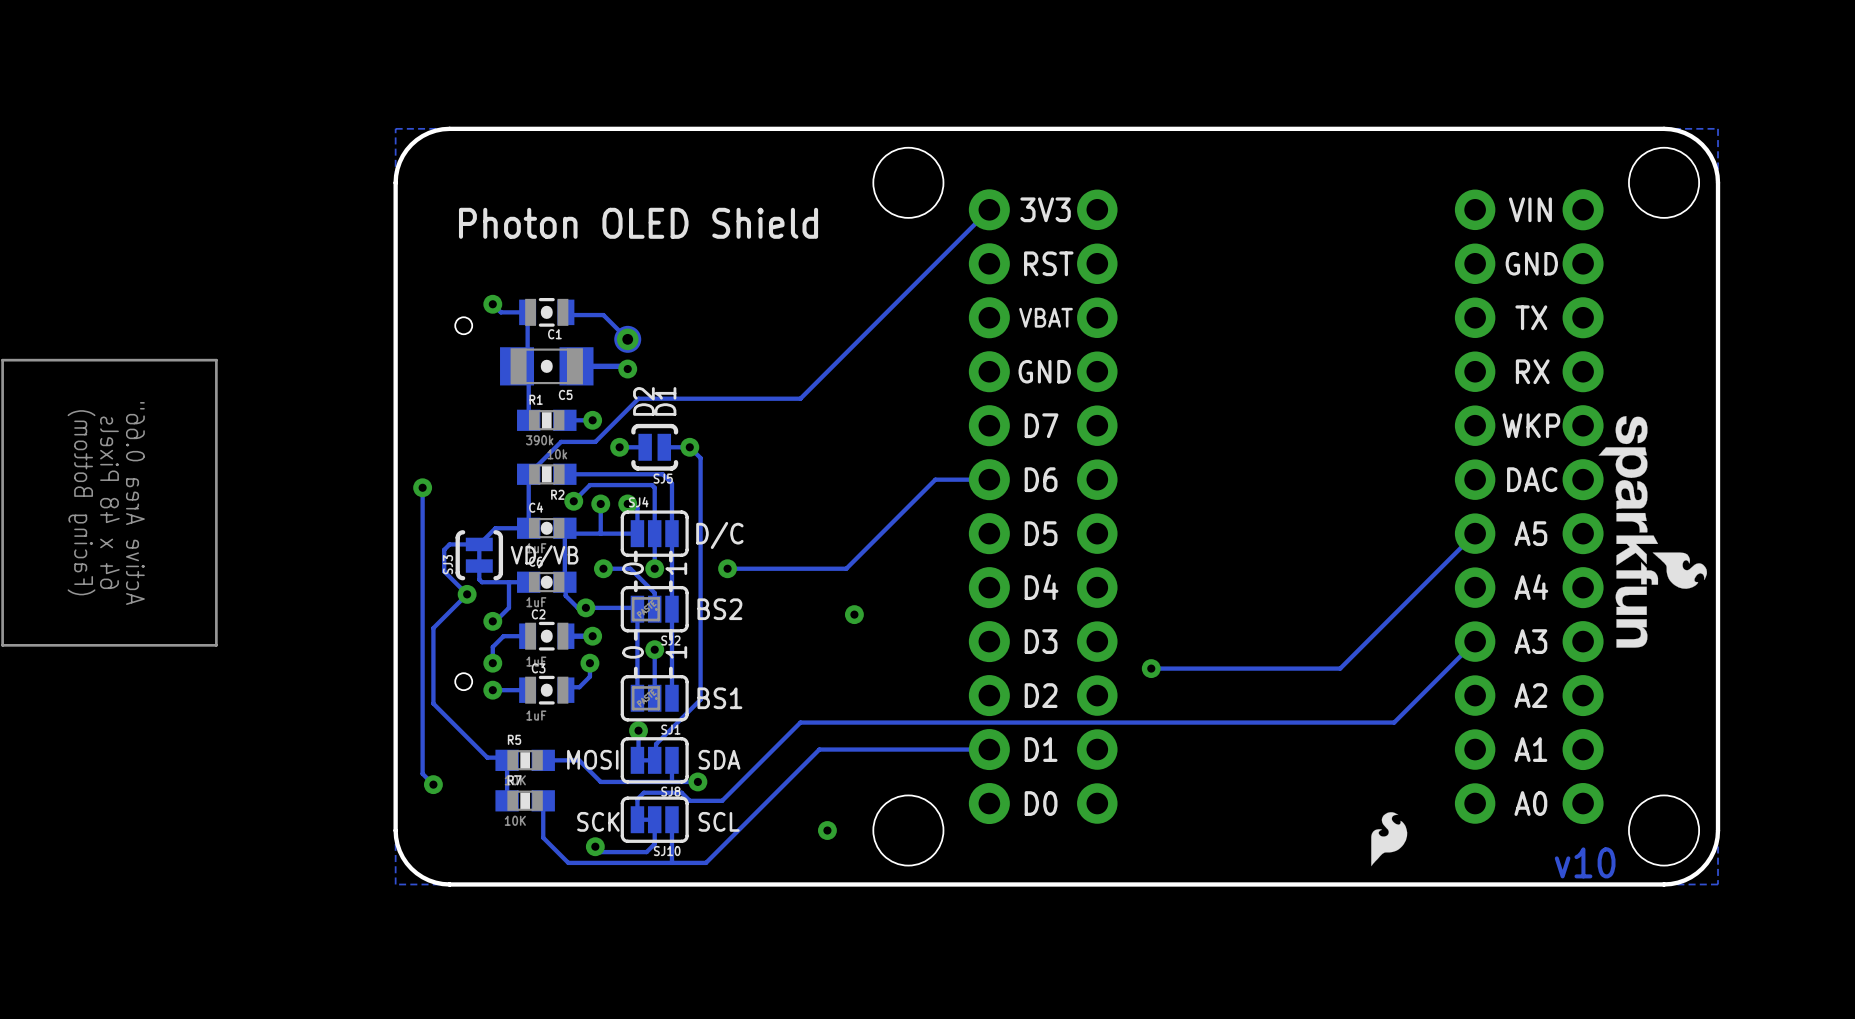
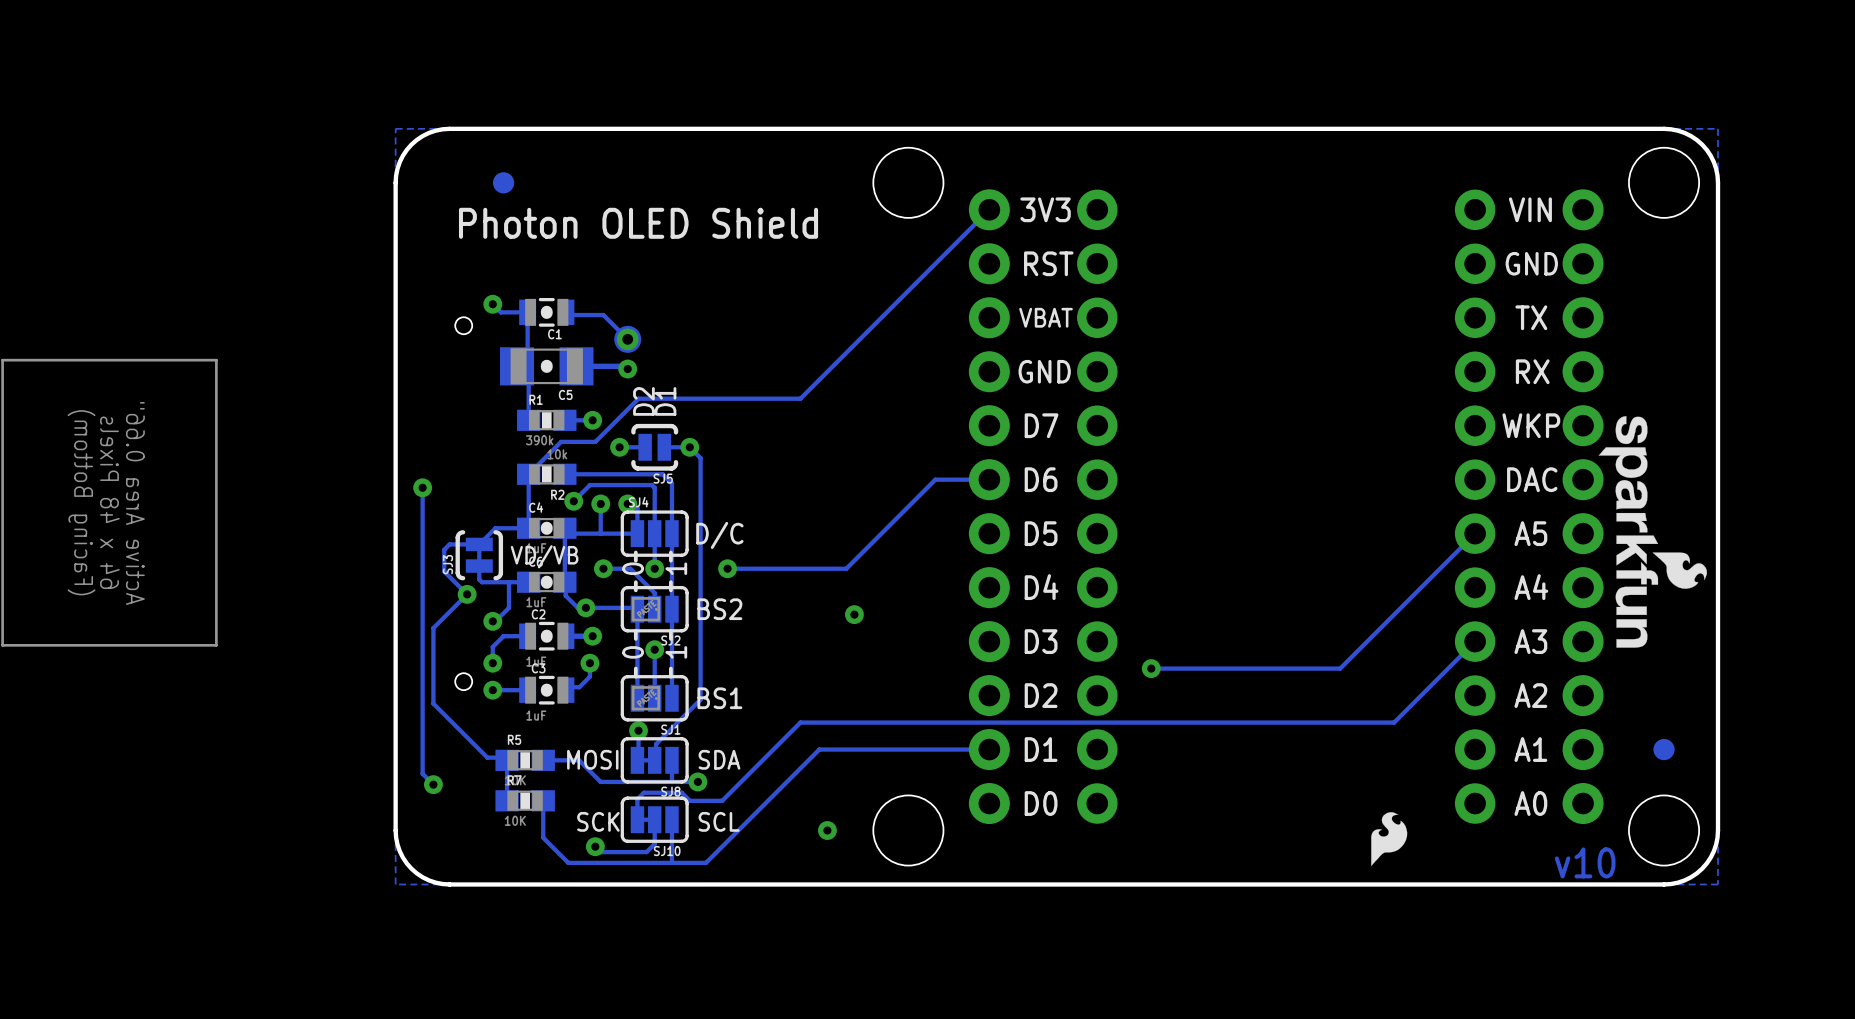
part: none -> (503, 182)
part: none -> (1664, 749)

